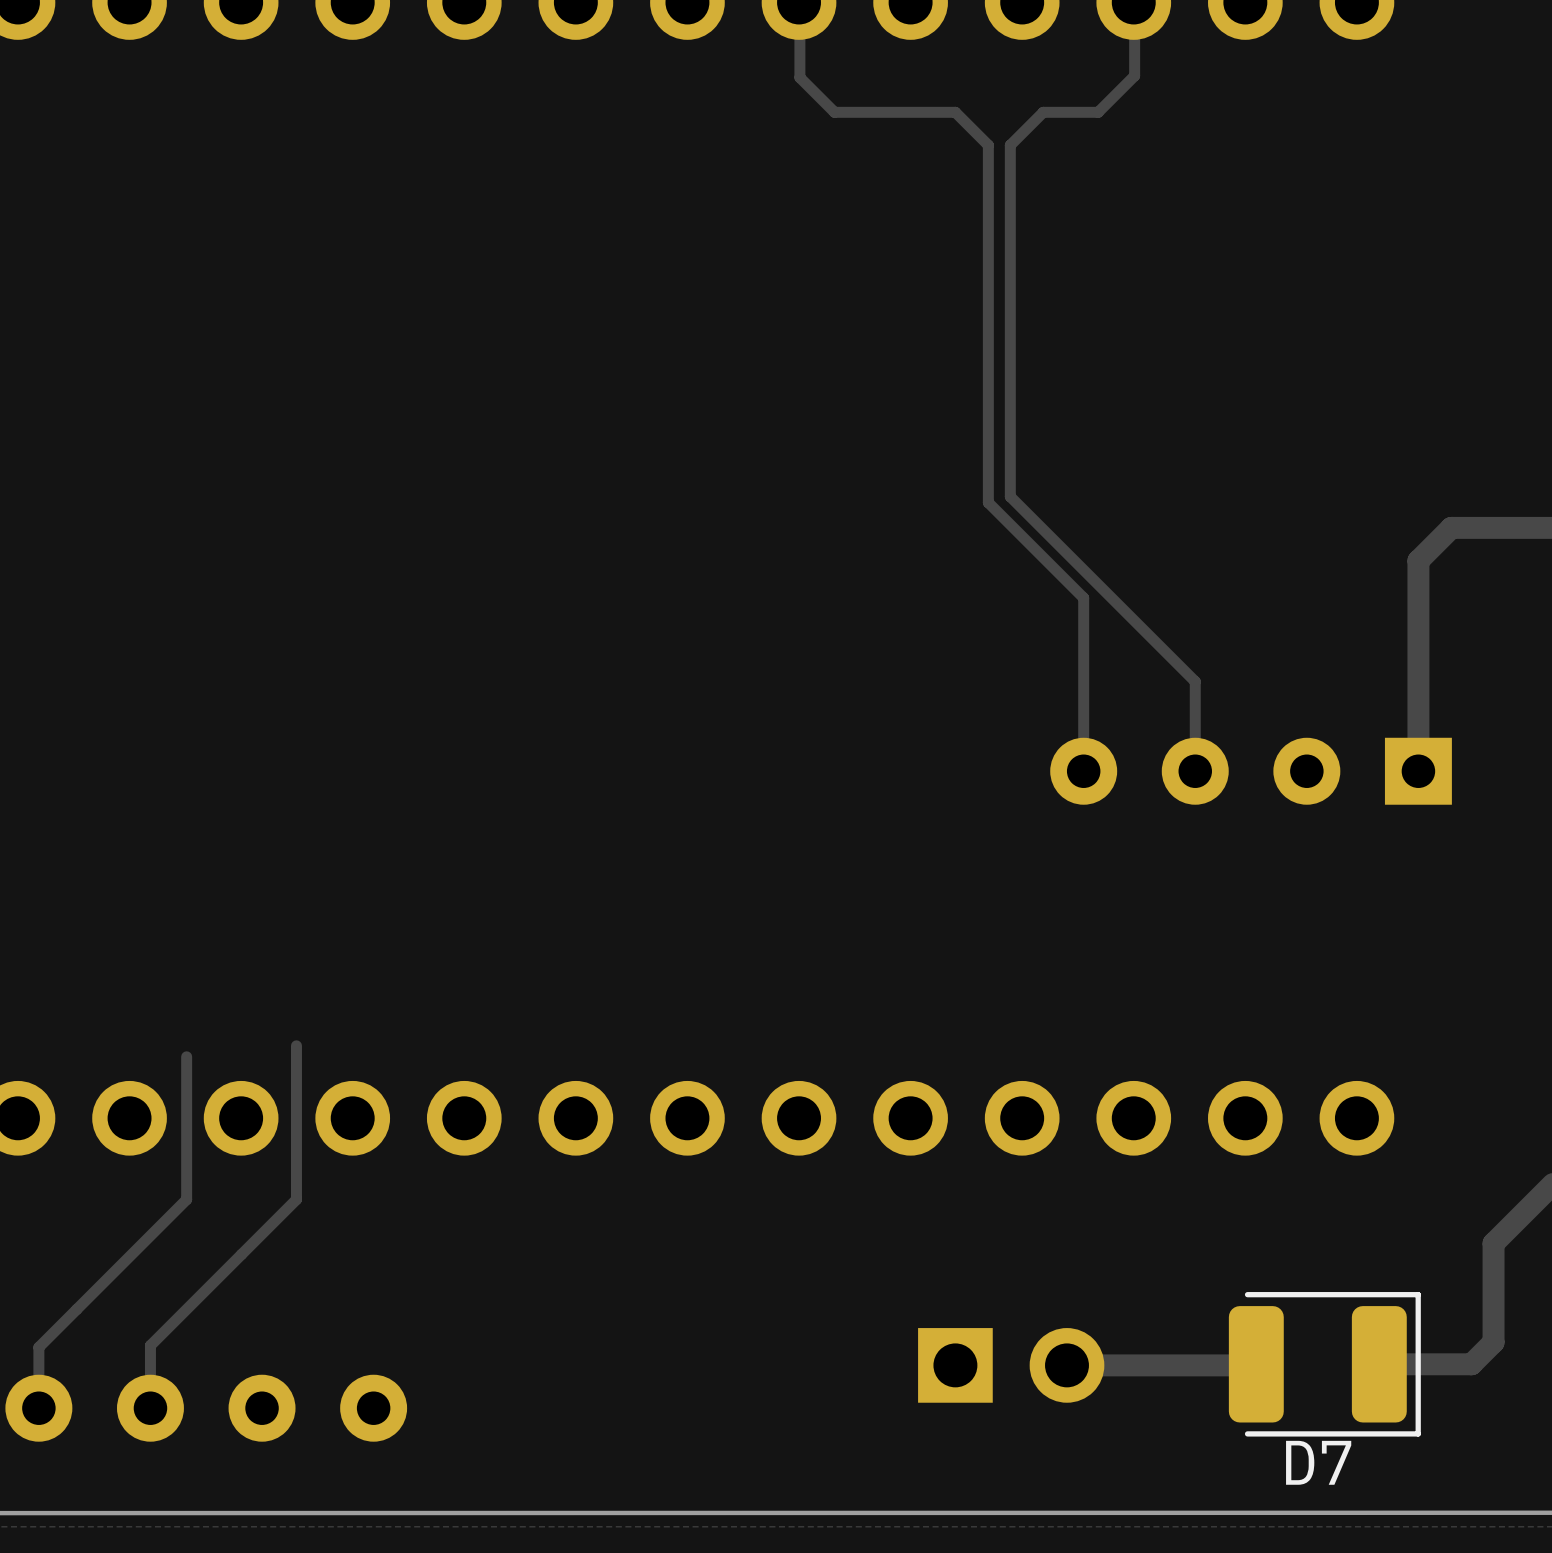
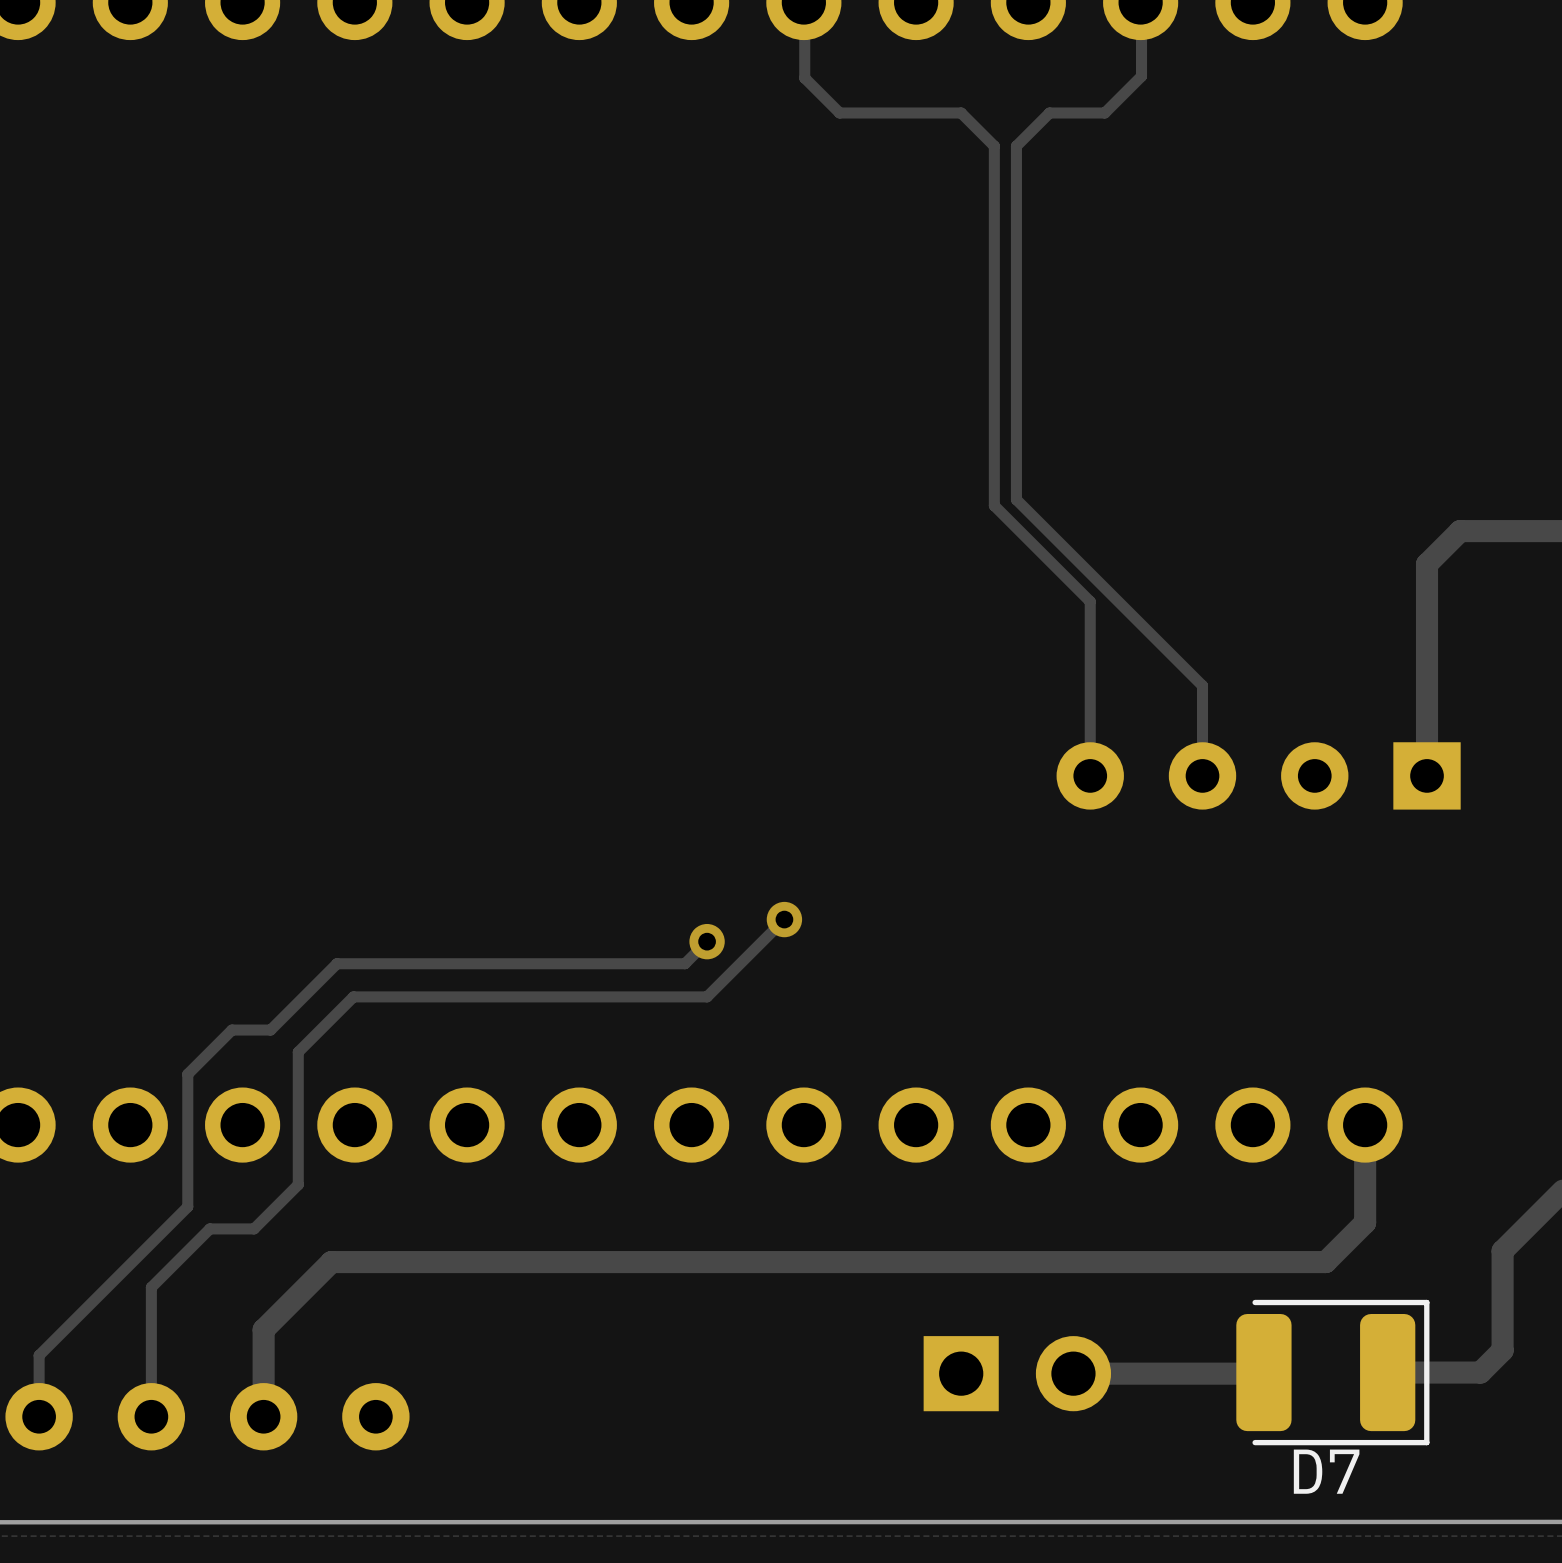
track: none -> (784, 919) (707, 996) (353, 996) (298, 1052)
via: none -> (784, 919)
via: none -> (707, 941)
track: (186, 1056) (186, 1067) -> (707, 941) (684, 963) (336, 963) (270, 1030) (231, 1030) (187, 1074)
track: none -> (1365, 1125) (1365, 1222) (1325, 1262) (331, 1262) (263, 1329) (263, 1416)
track: (296, 1177) (296, 1199) (150, 1345) -> (298, 1184) (254, 1228) (209, 1228) (151, 1287) (151, 1353)

